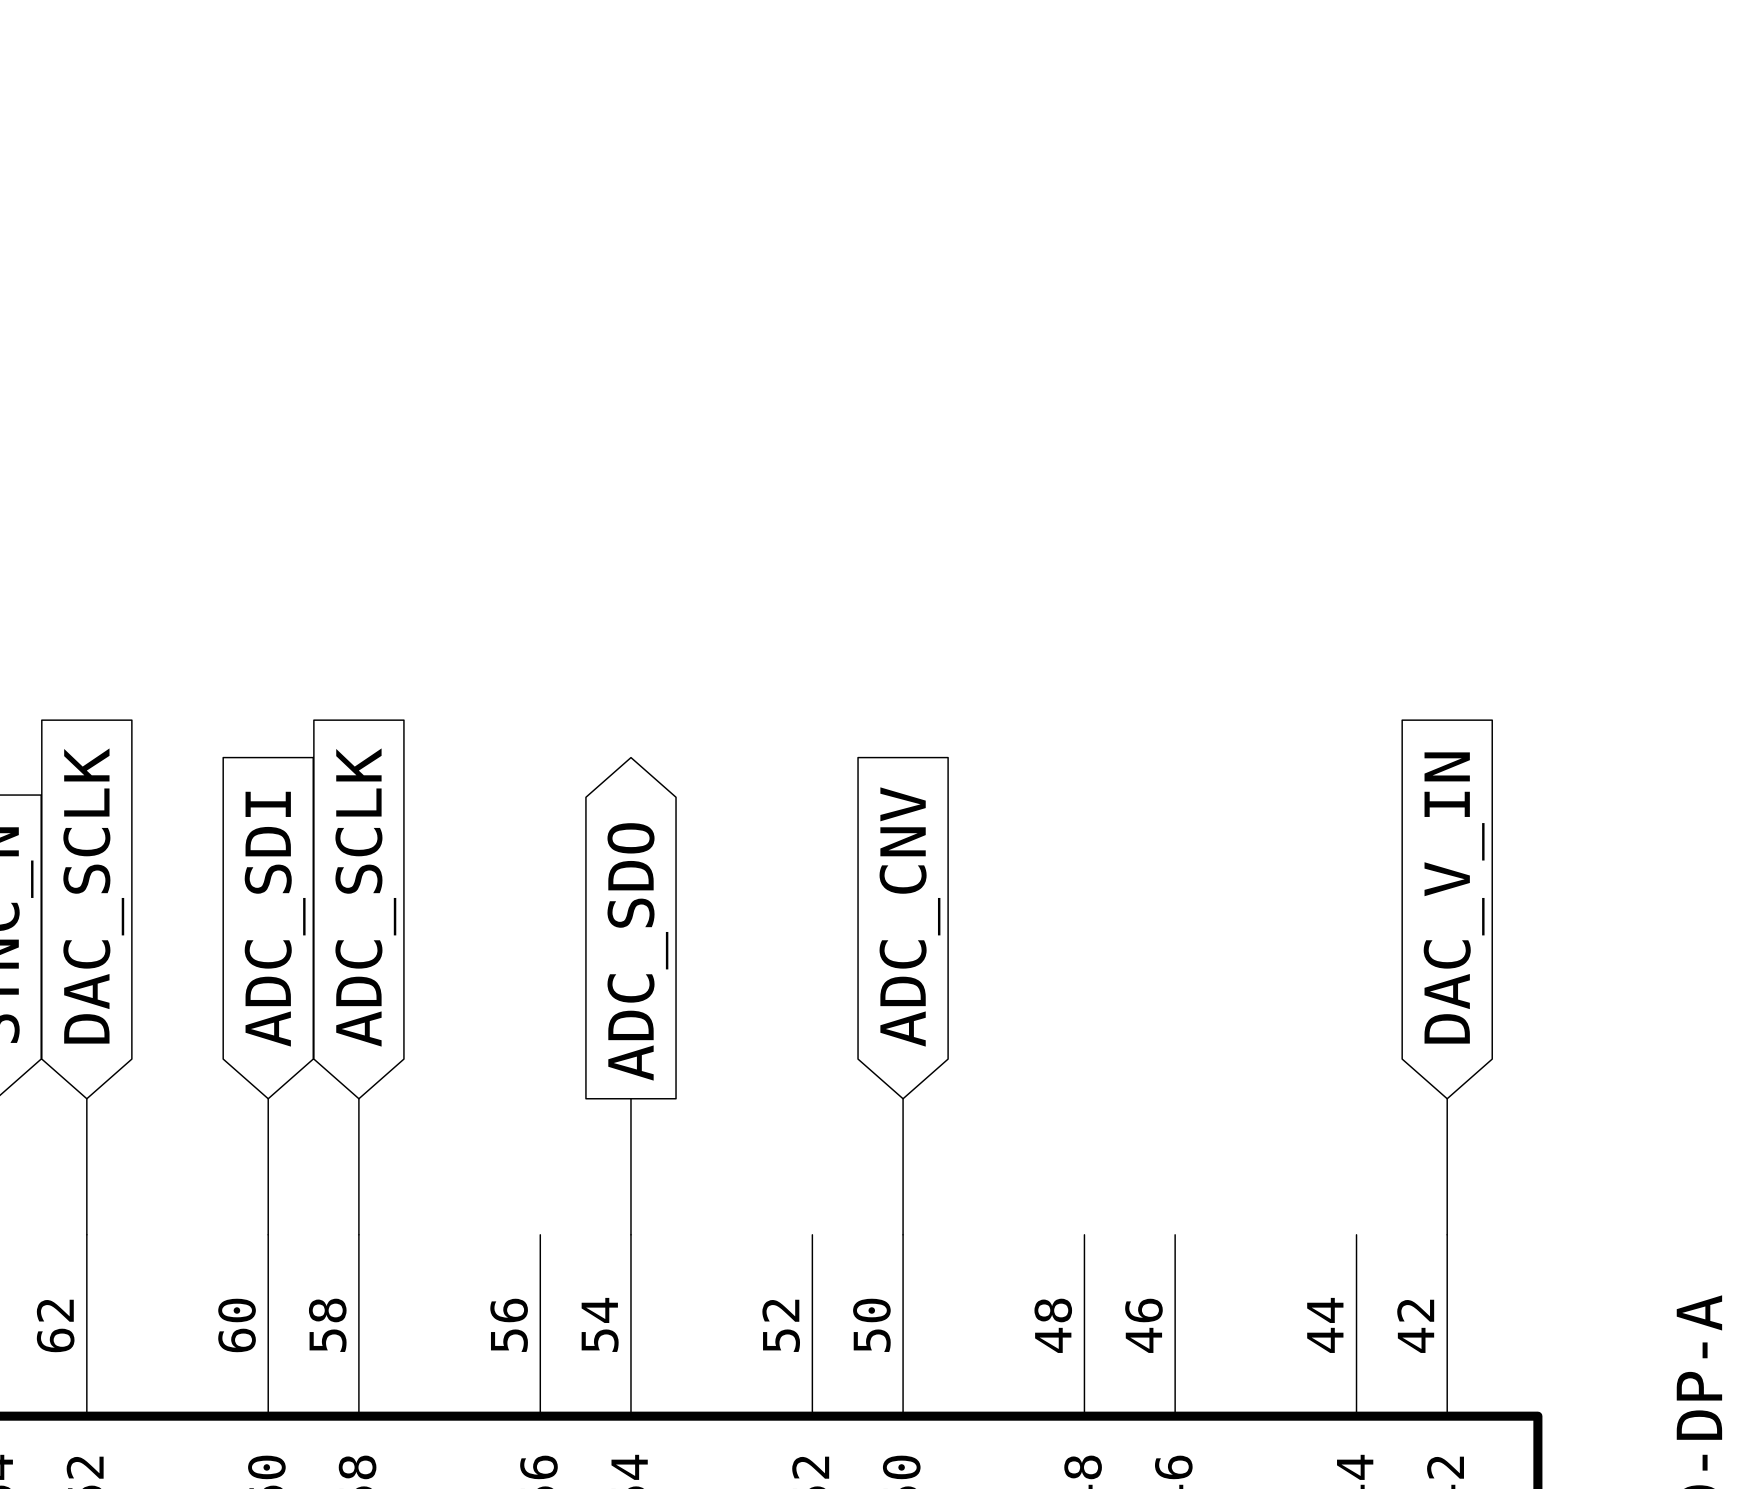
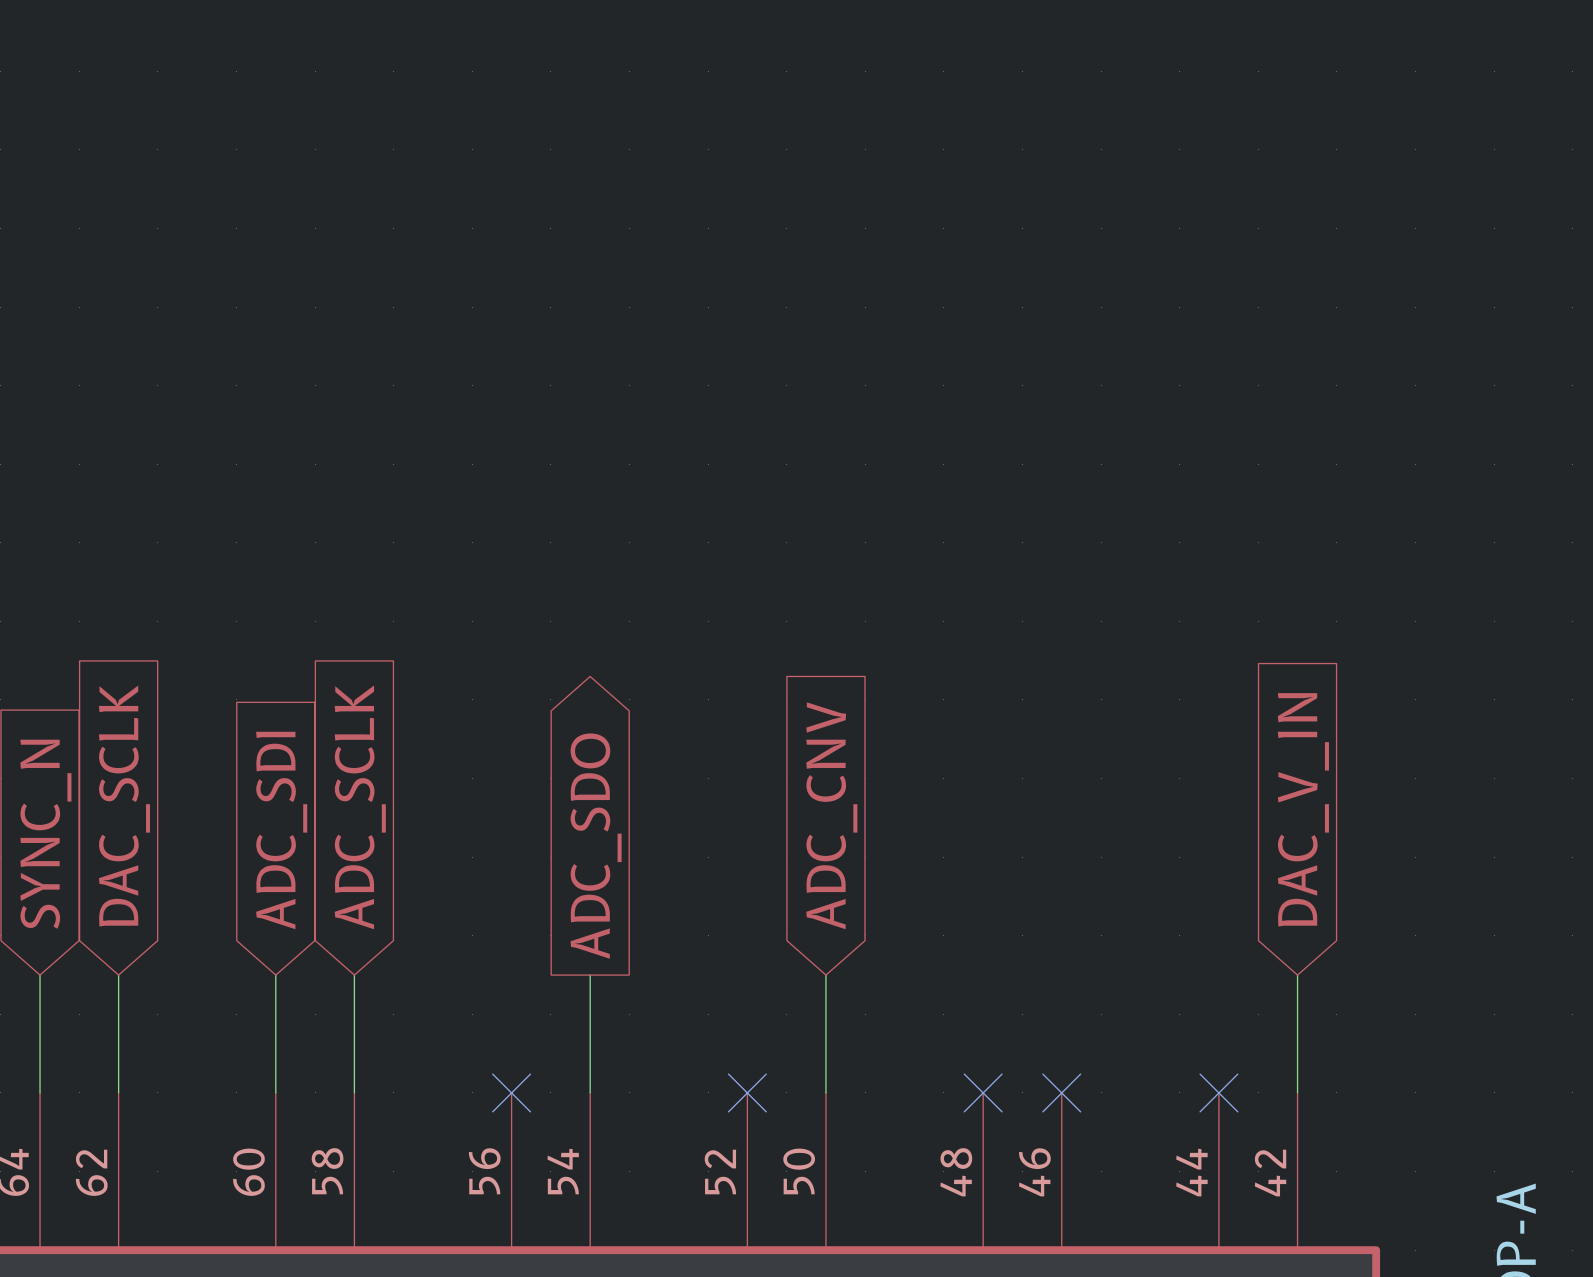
no-connect mark: none -> (511, 1092)
no-connect mark: none -> (747, 1092)
no-connect mark: none -> (983, 1092)
no-connect mark: none -> (1061, 1092)
no-connect mark: none -> (1218, 1092)

